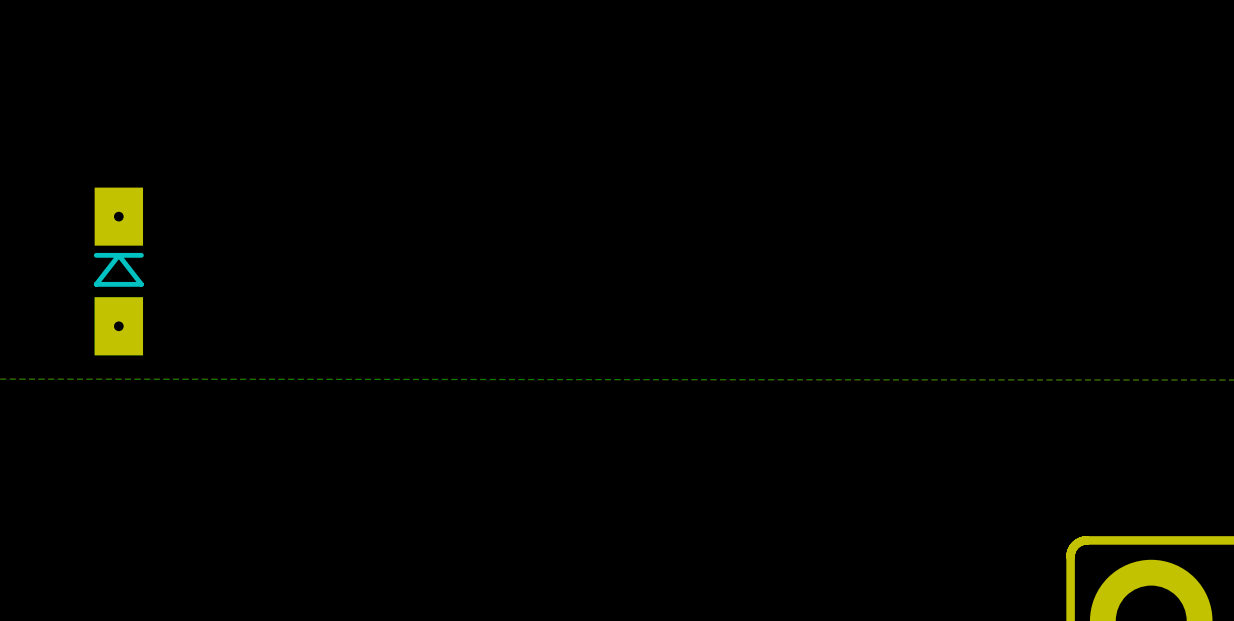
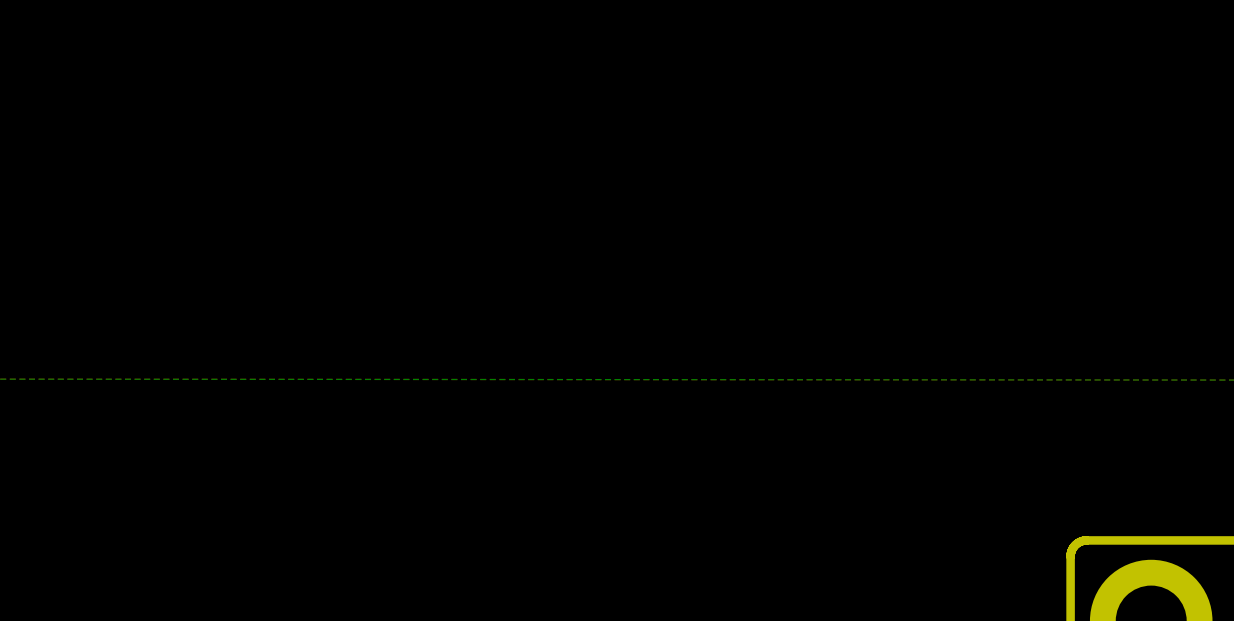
part: (118, 271) -> none

